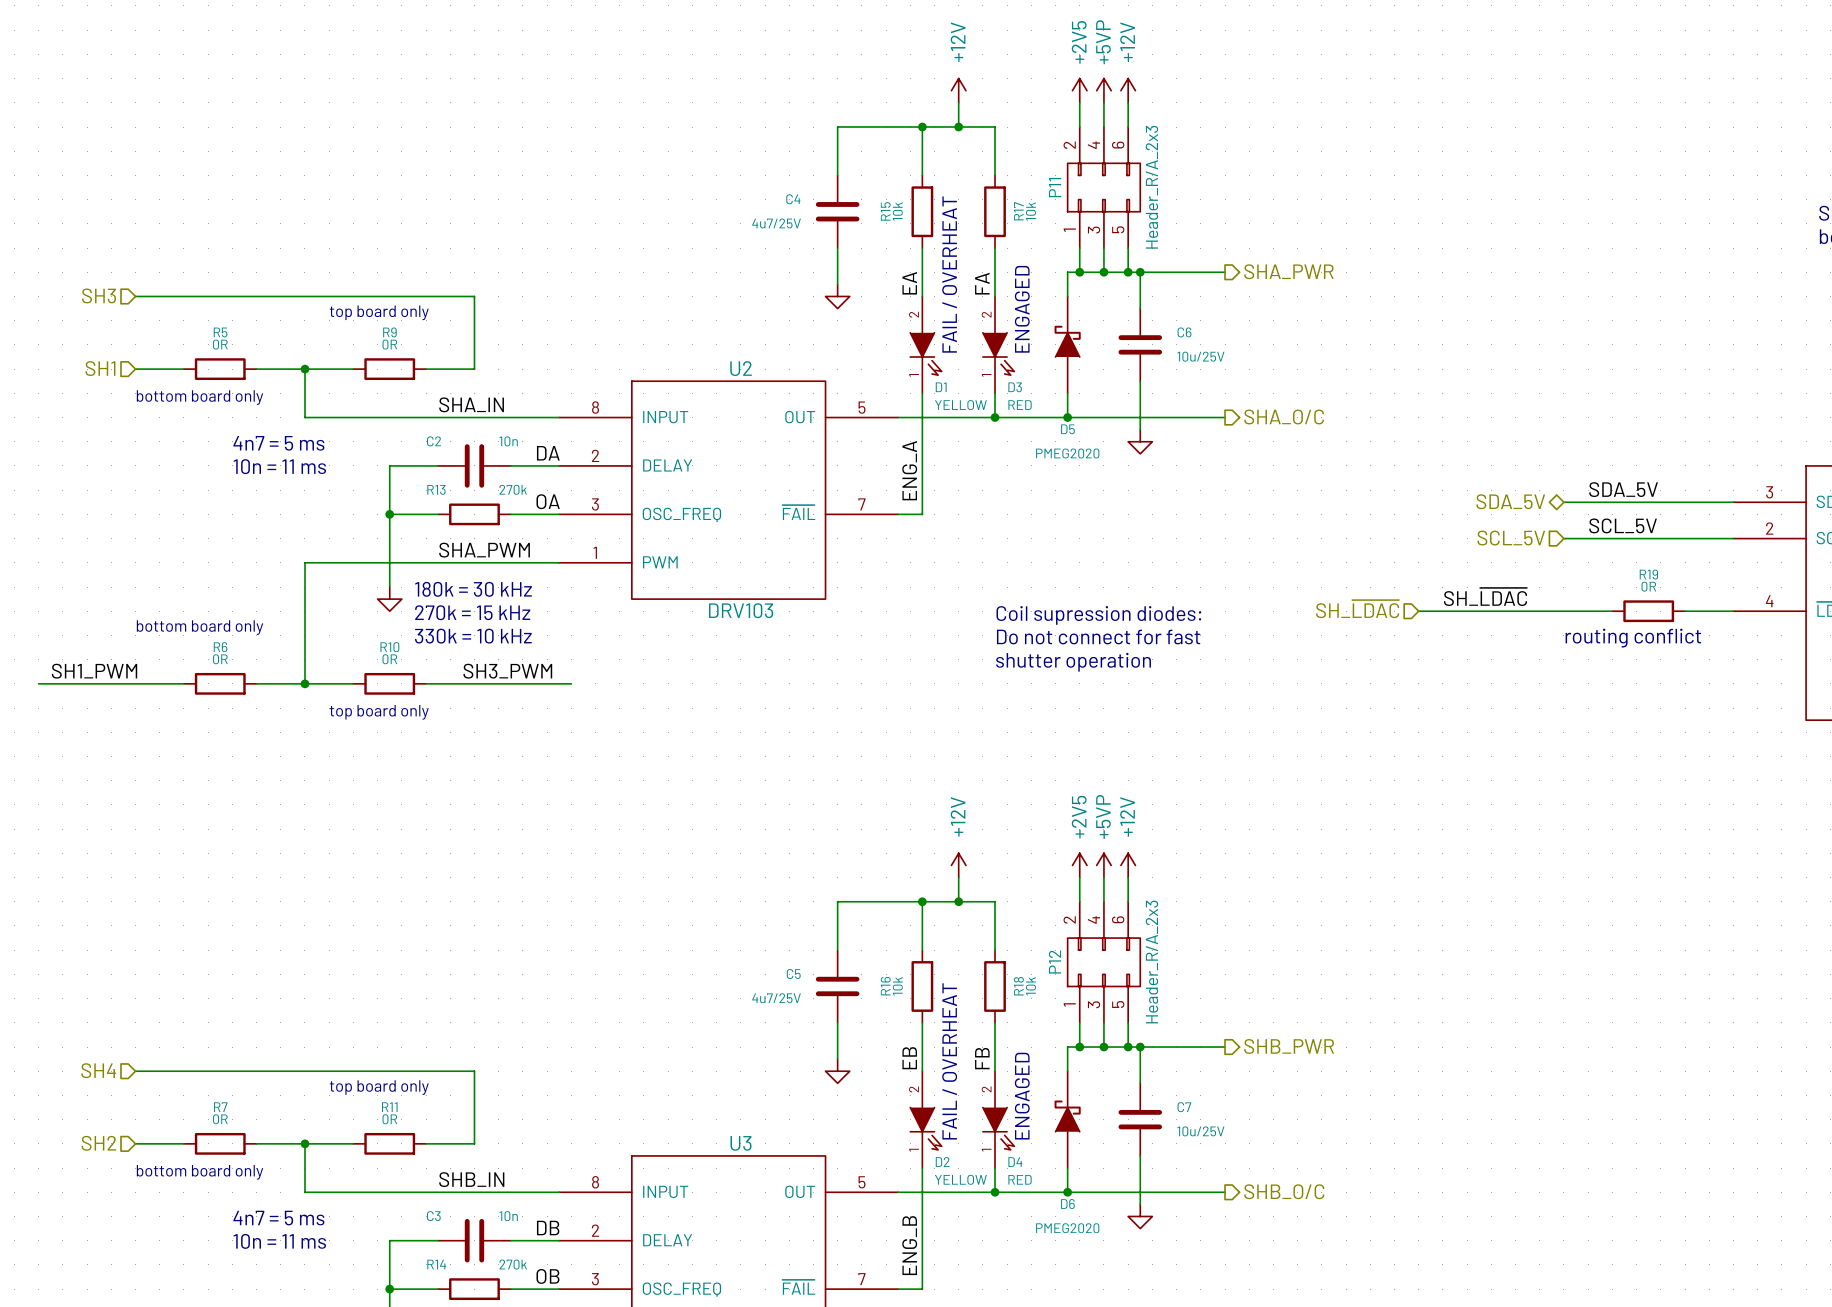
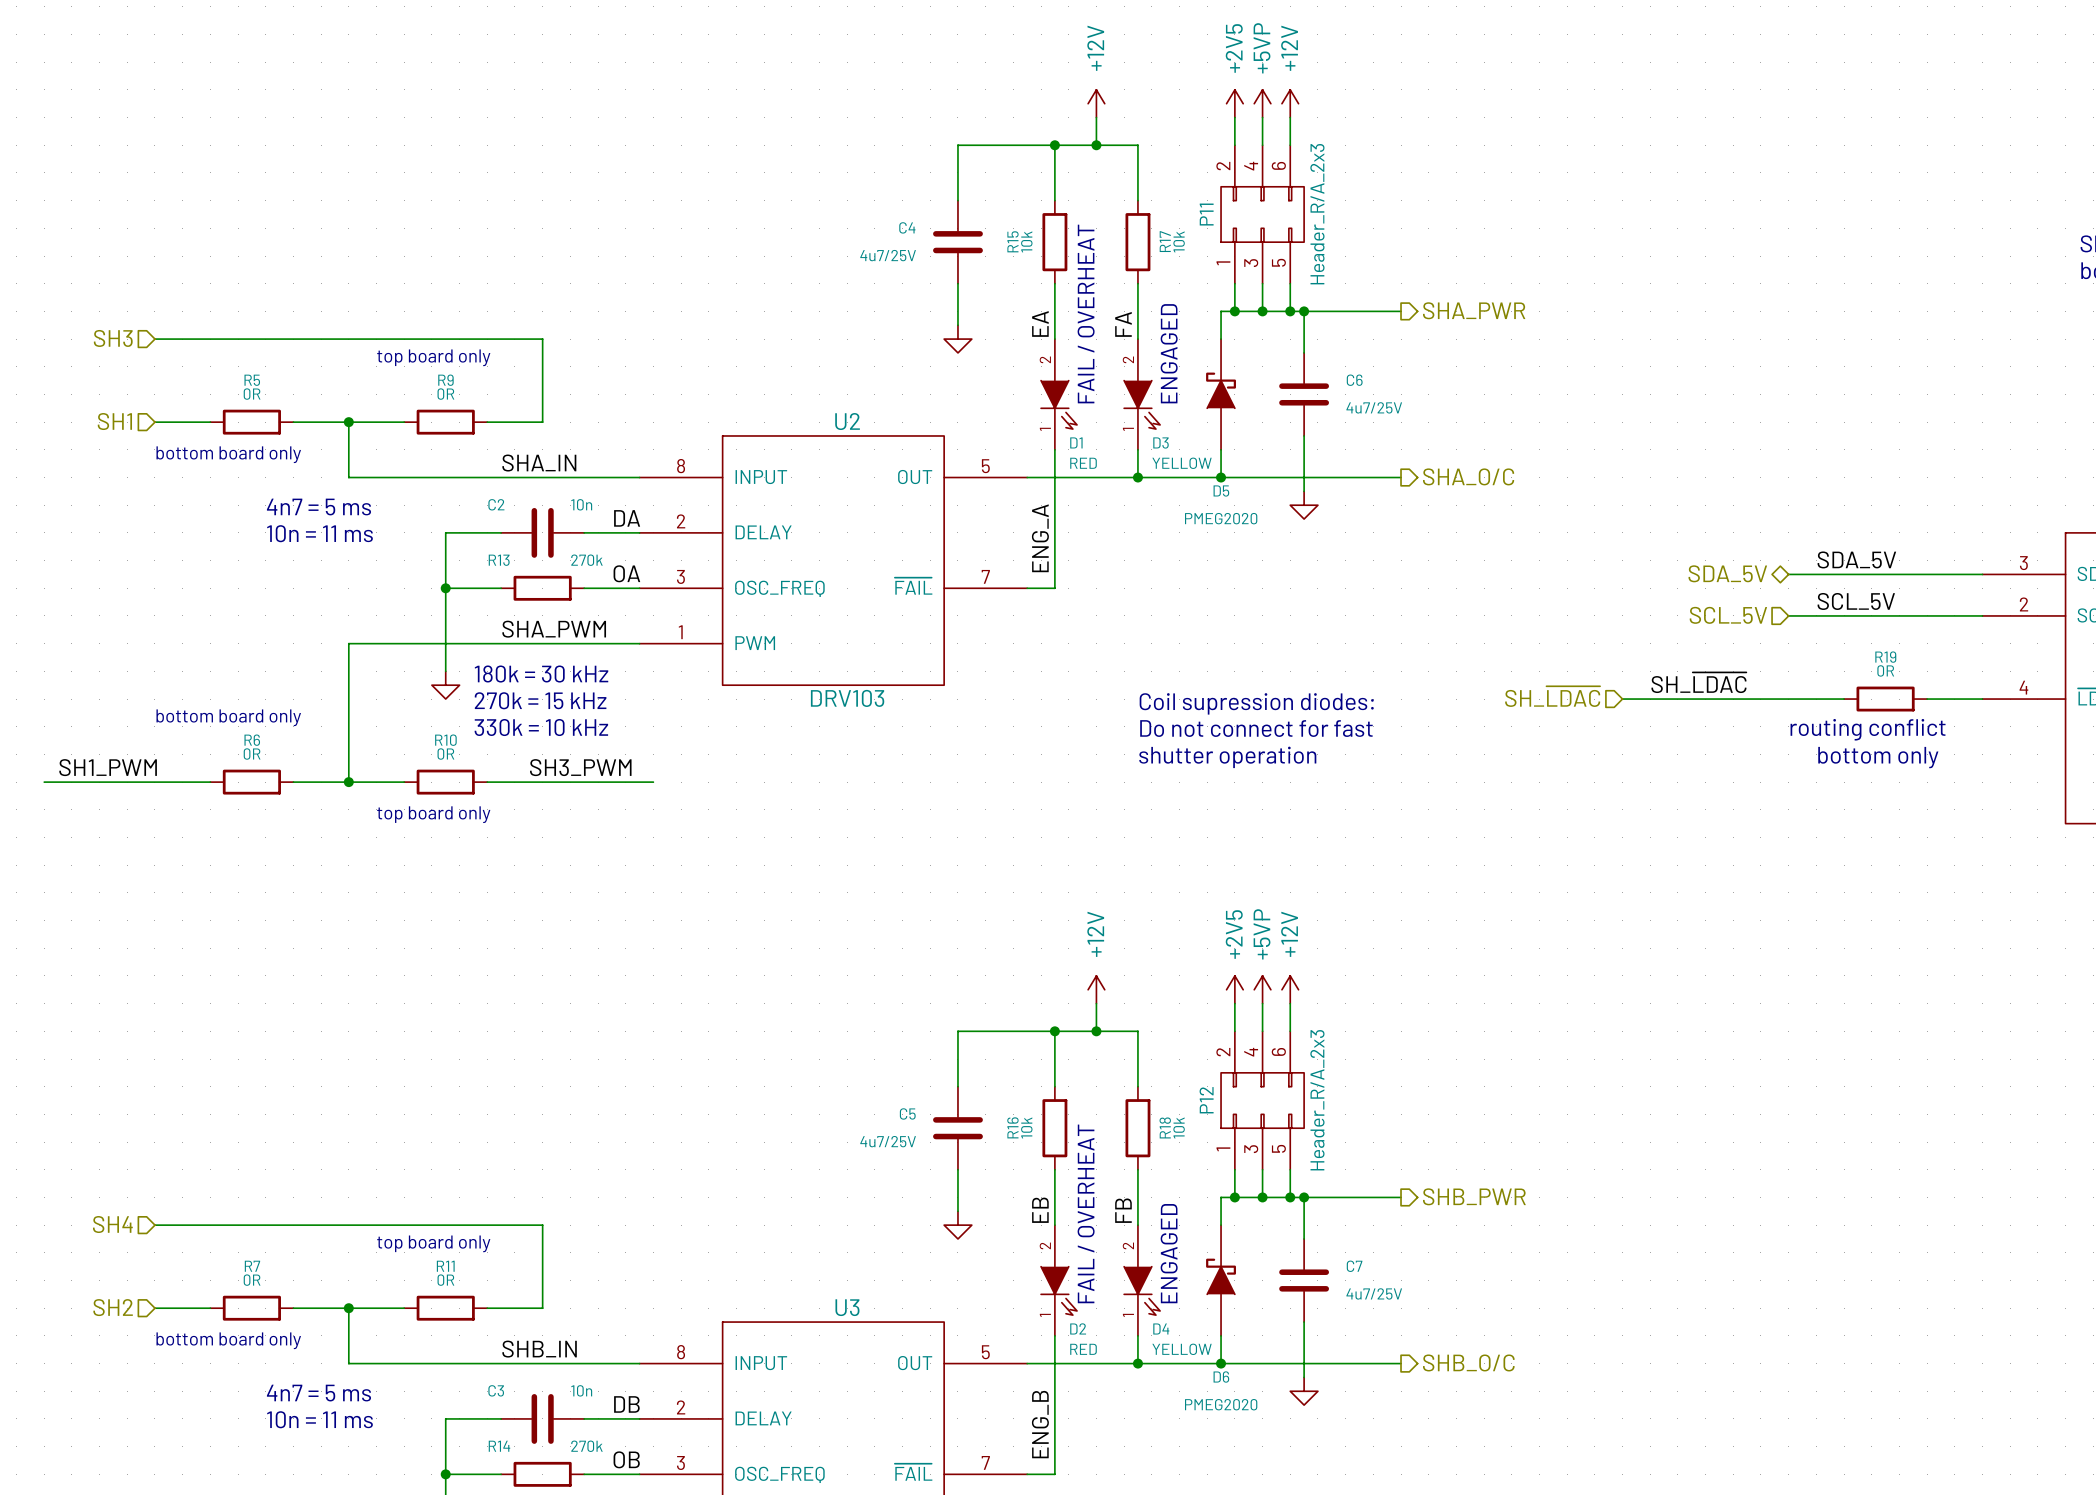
C6 value: 10u/25V (1200, 356) -> 4u7/25V (1374, 407)
D1 value: YELLOW (960, 405) -> RED (1083, 463)
D3 value: RED (1020, 405) -> YELLOW (1182, 463)
text: none -> bottom only (1878, 757)
C7 value: 10u/25V (1200, 1131) -> 4u7/25V (1374, 1293)
D2 value: YELLOW (960, 1179) -> RED (1083, 1349)
D4 value: RED (1020, 1179) -> YELLOW (1182, 1349)

